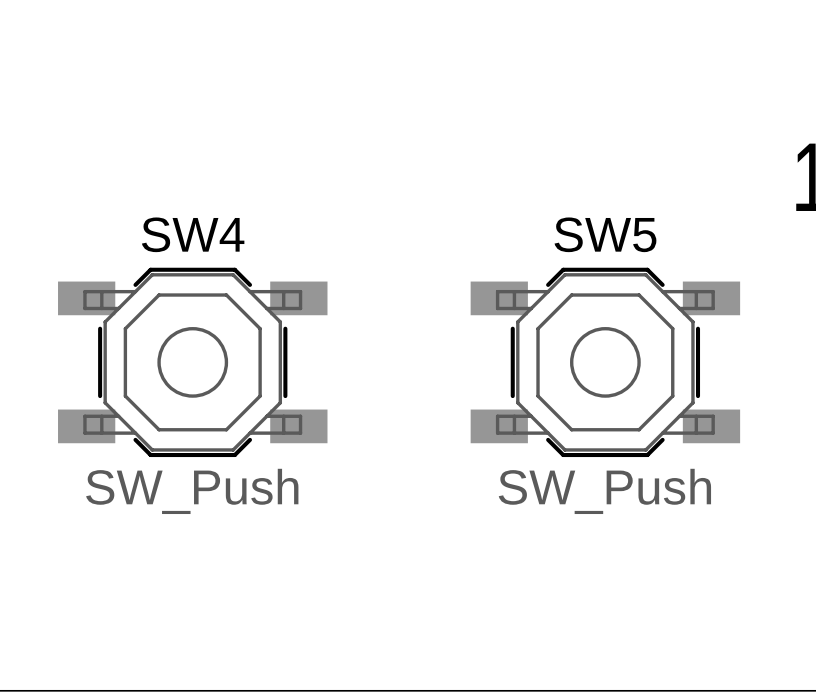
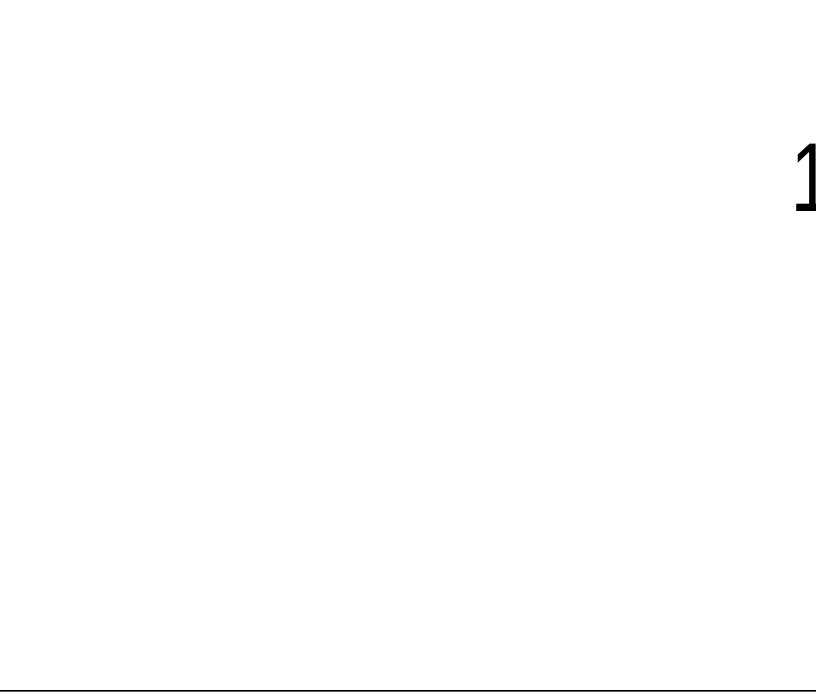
SW4: SW_Push (192, 362) -> none
SW5: SW_Push (605, 362) -> none

